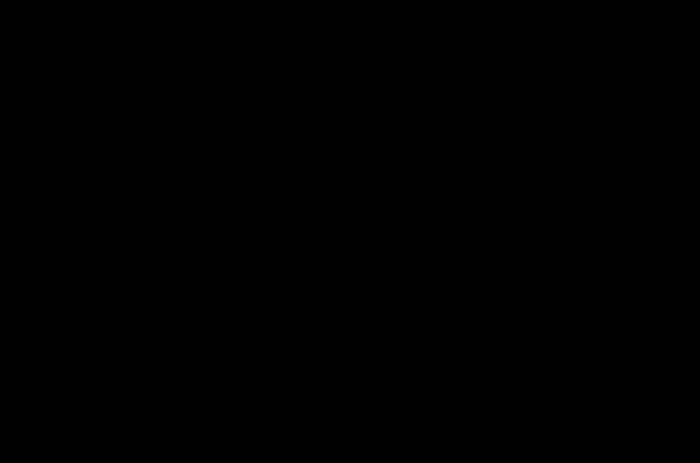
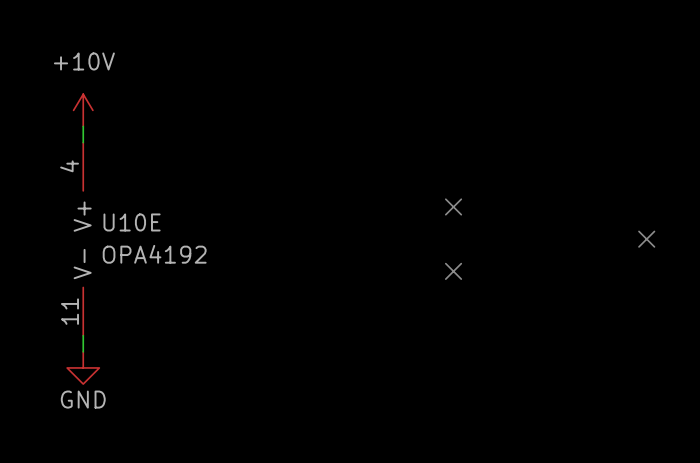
power symbol: none -> +10V (83, 110)
wire: none -> (83, 126) (83, 142)
no-connect mark: none -> (453, 206)
U10E: none -> OPA4192 (83, 239)
no-connect mark: none -> (646, 239)
no-connect mark: none -> (453, 271)
wire: none -> (83, 335) (83, 351)
power symbol: none -> GND (83, 367)

